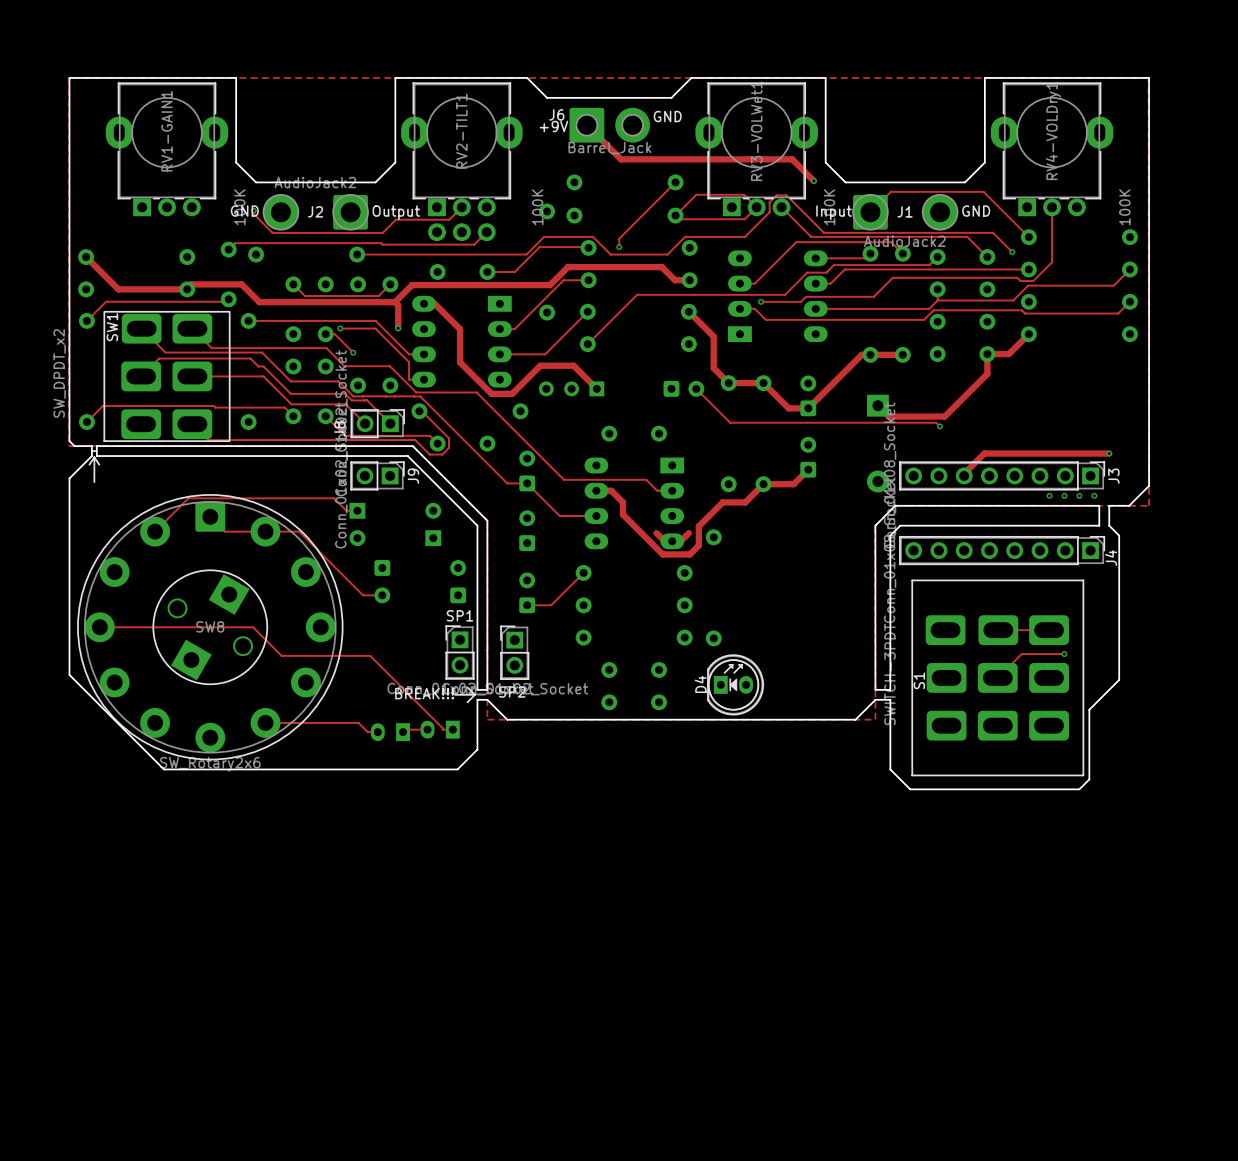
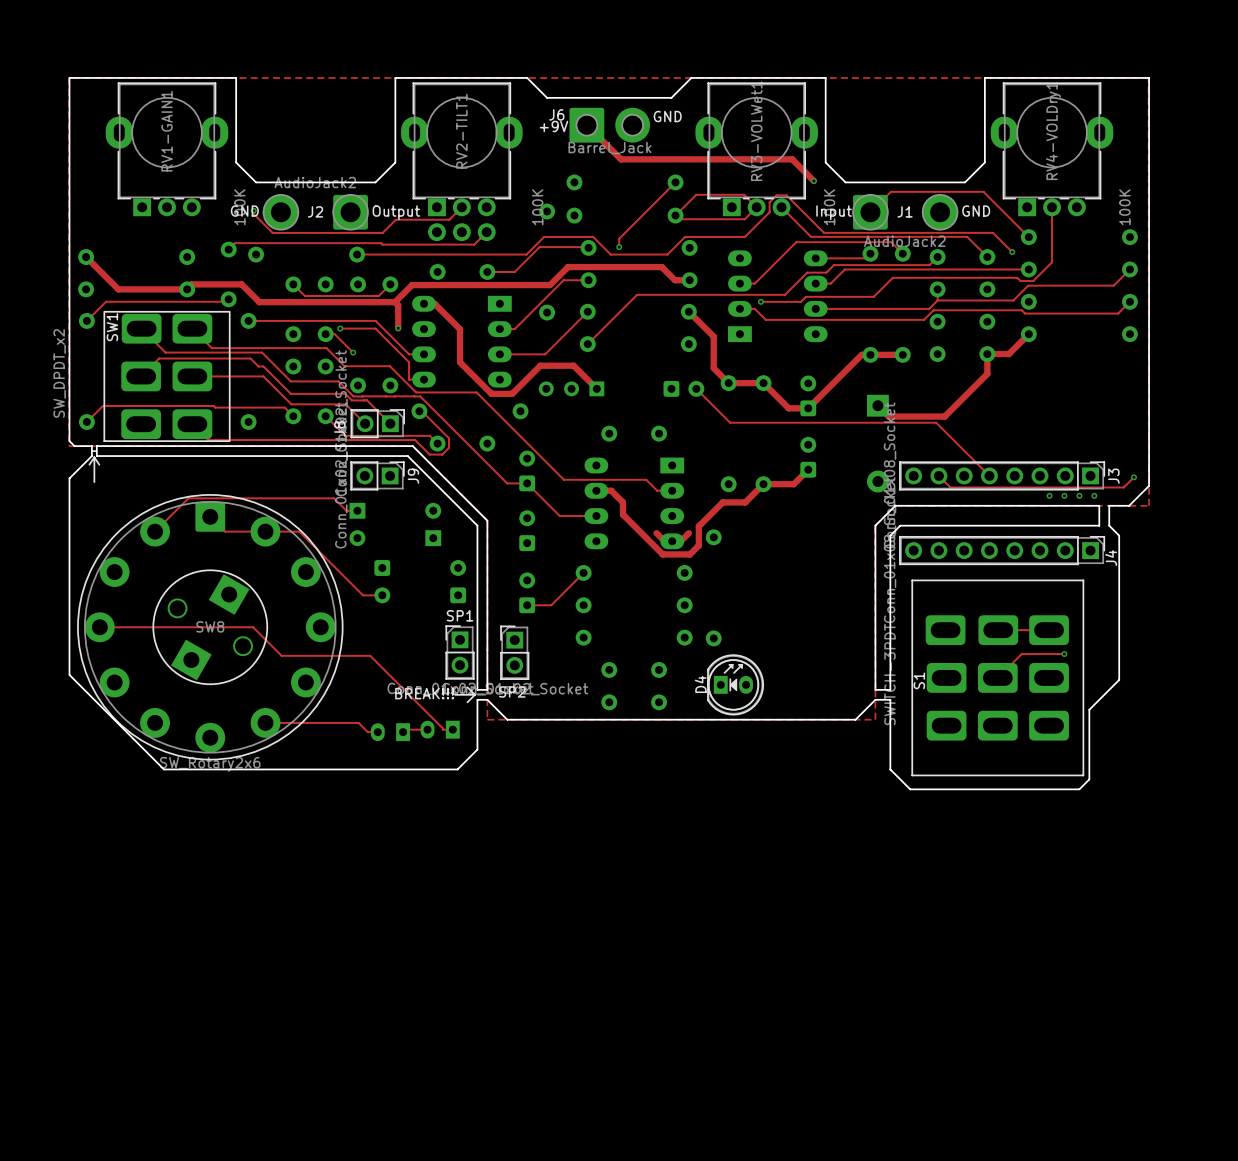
track: none -> (939, 426) (989, 475)
via: (939, 426) -> none
track: (1109, 453) (984, 453) (964, 475) -> none
via position: (1109, 453) -> (1133, 477)
track: none -> (938, 475) (950, 487) (1123, 487) (1133, 477)

